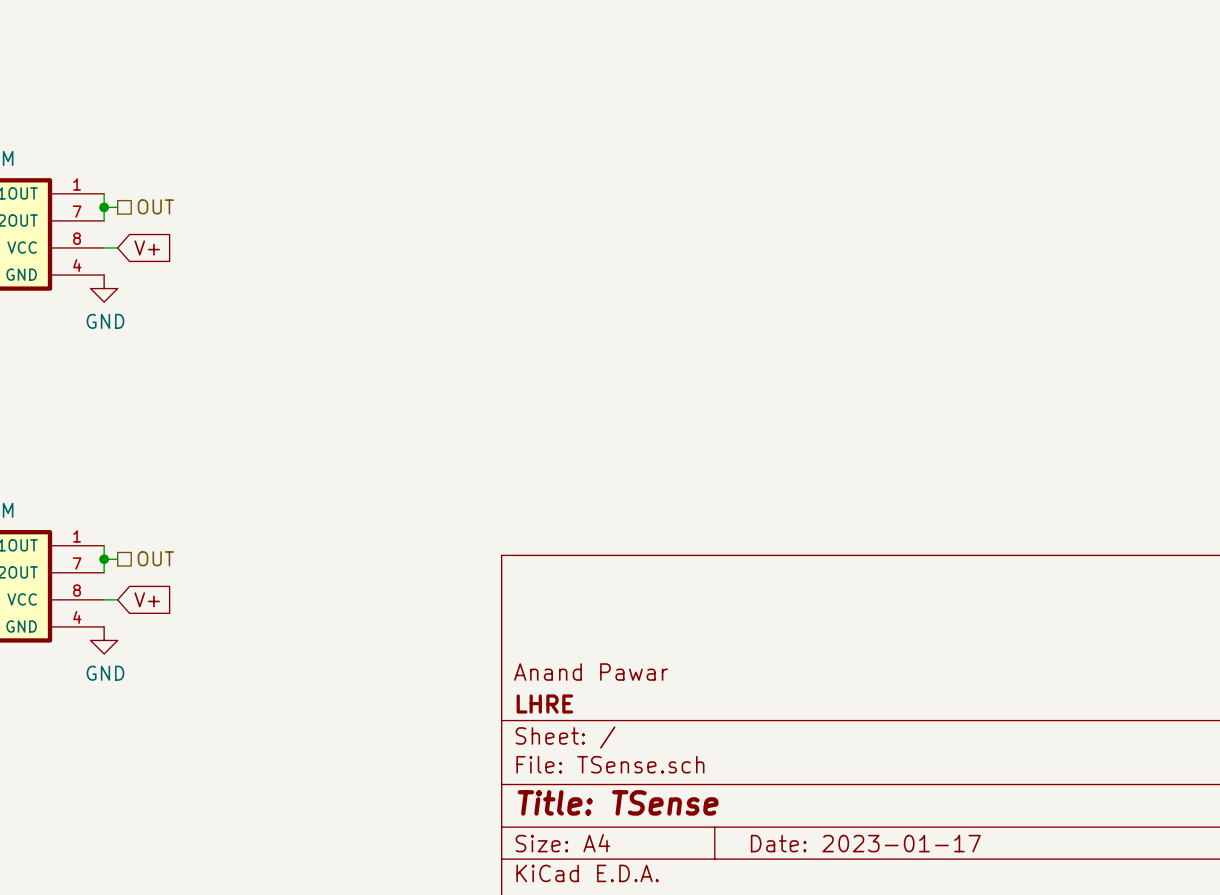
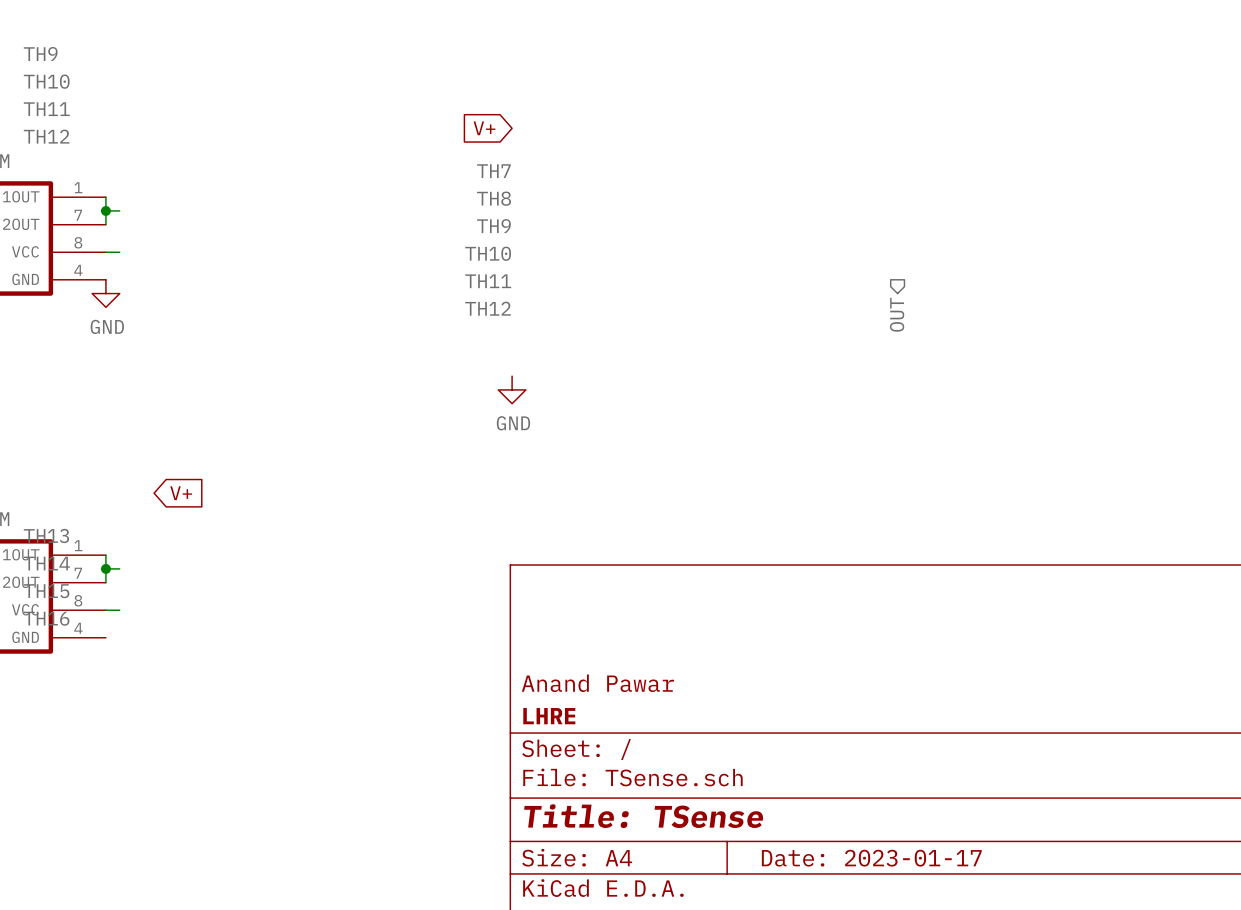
label: none -> TH9 (40, 53)
label: none -> TH10 (46, 81)
label: none -> TH11 (46, 109)
global label: none -> V+ (484, 128)
label: none -> TH12 (46, 136)
label: none -> TH7 (493, 171)
label: none -> TH8 (494, 198)
hierarchical label: OUT (155, 206) -> none
label: none -> TH9 (493, 226)
global label: V+ (147, 247) -> none
label: none -> TH10 (488, 253)
label: none -> TH11 (488, 281)
label: none -> TH12 (488, 308)
hierarchical label: none -> OUT (897, 314)
power symbol: none -> GND (512, 389)
global label: none -> V+ (181, 493)
label: none -> TH13 (46, 535)
label: none -> TH14 (46, 563)
hierarchical label: OUT (155, 558) -> none
label: none -> TH15 (46, 591)
global label: V+ (147, 599) -> none
label: none -> TH16 (46, 618)
power symbol: GND (104, 640) -> none

